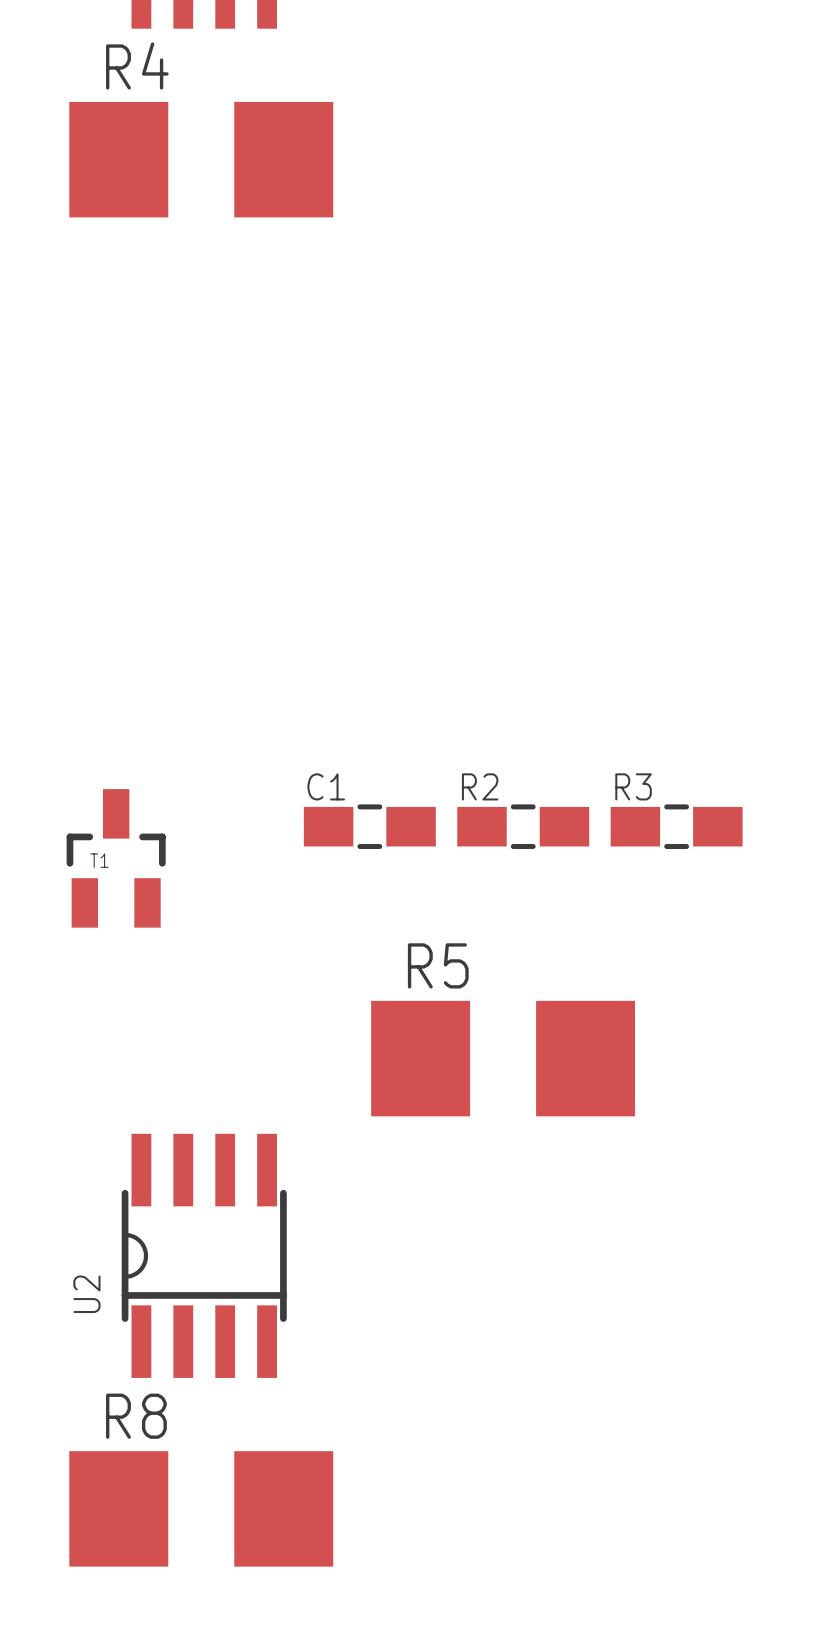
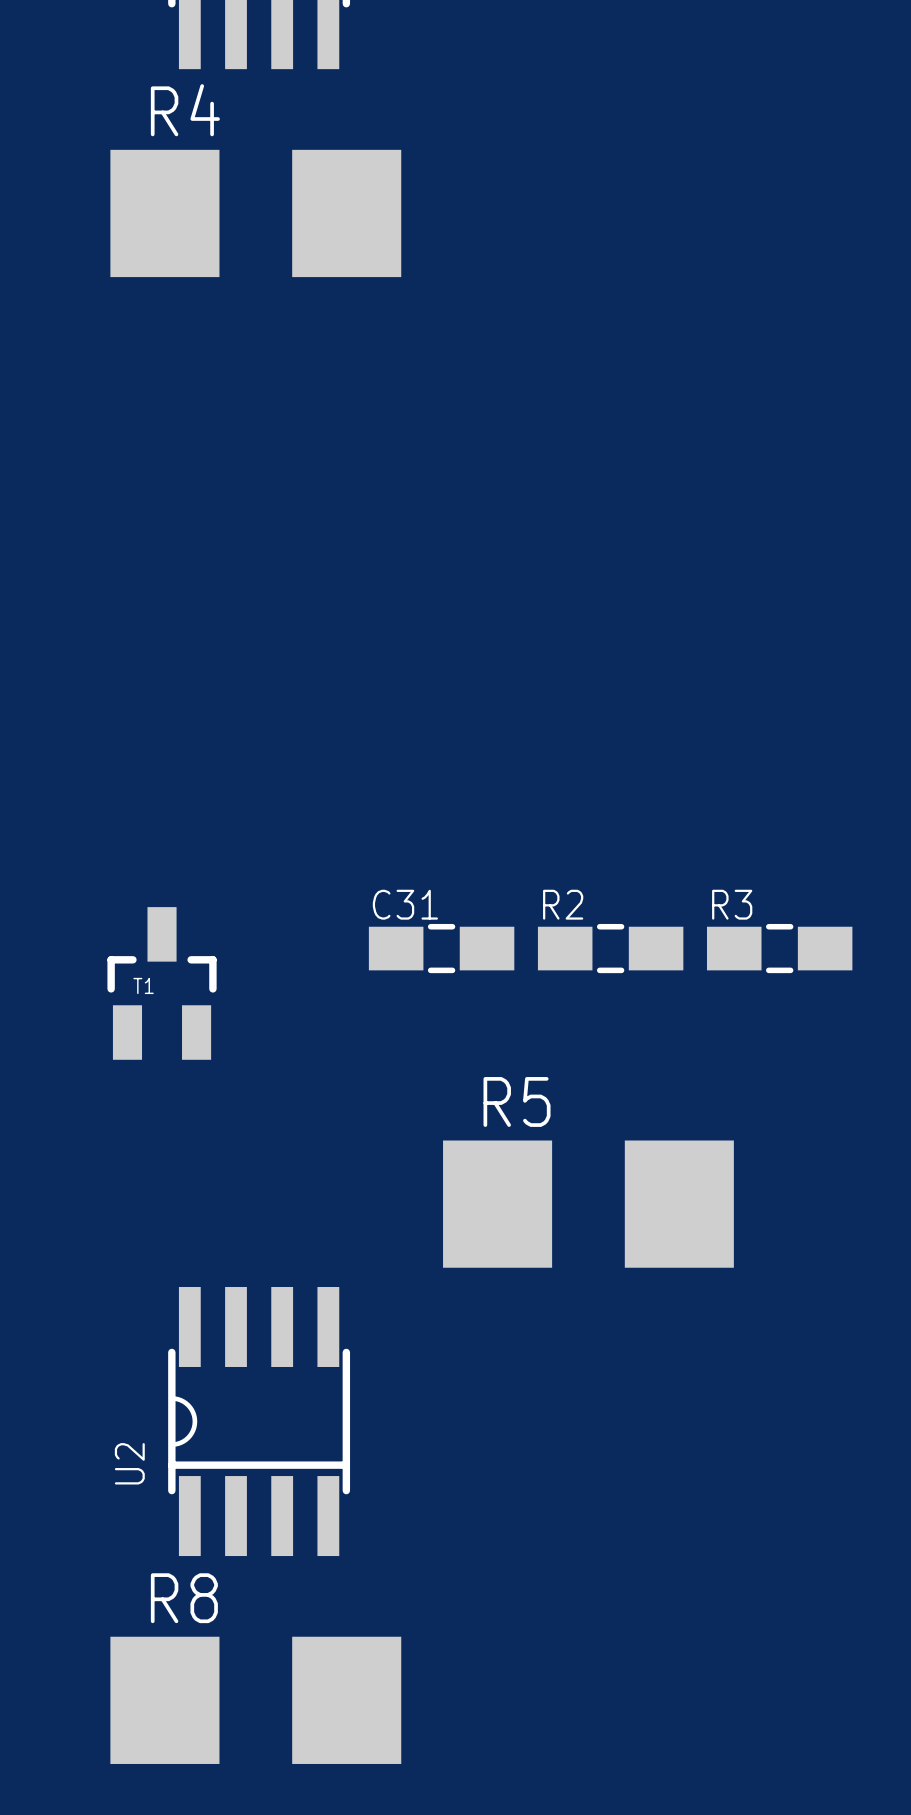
C1 name: C1 (326, 786) -> C31 (405, 904)

